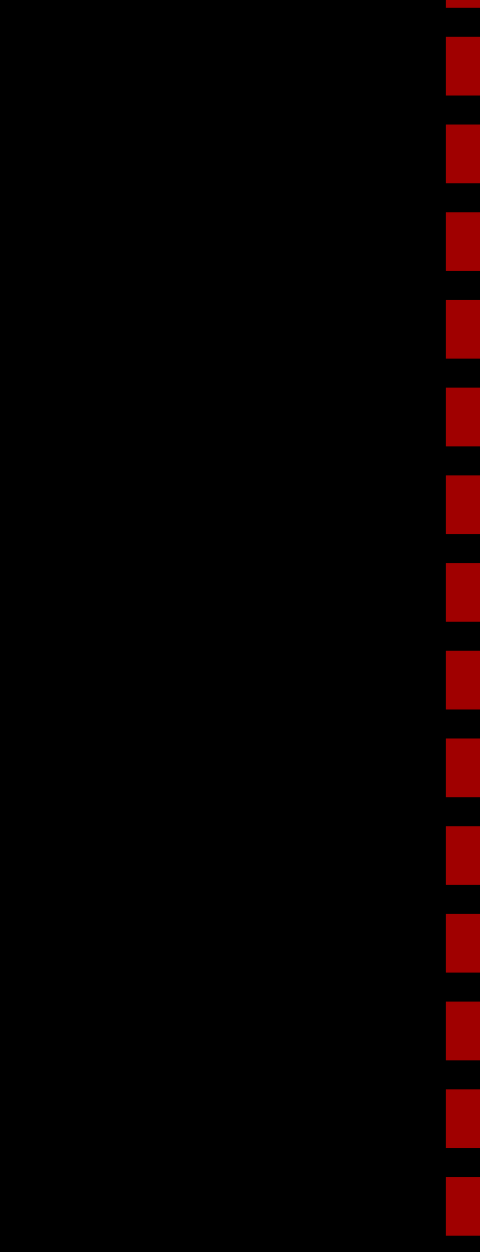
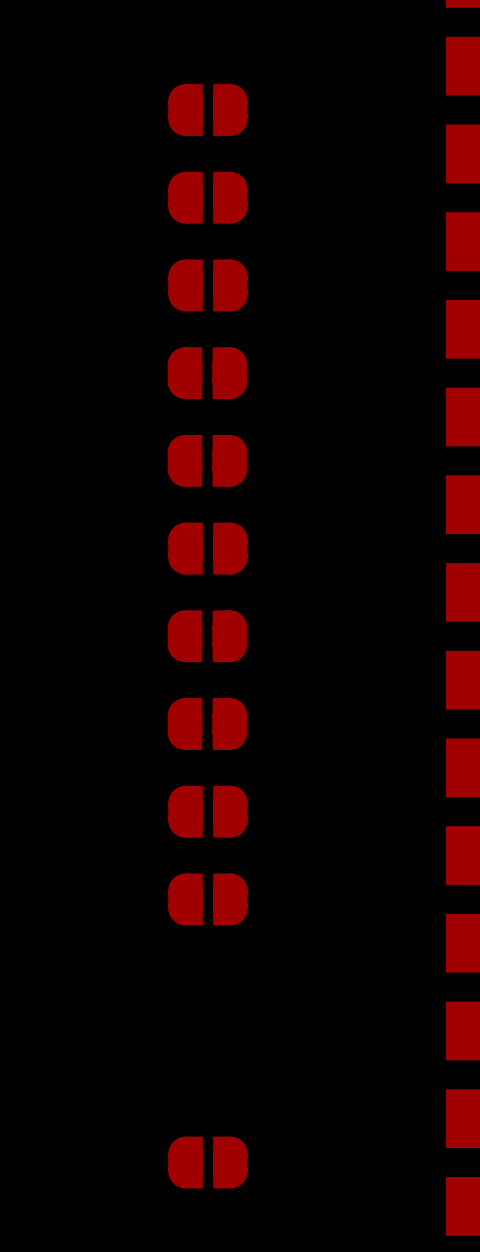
part: none -> (207, 110)
part: none -> (207, 197)
part: none -> (207, 285)
part: none -> (207, 373)
part: none -> (207, 460)
part: none -> (207, 548)
part: none -> (207, 636)
part: none -> (207, 723)
part: none -> (207, 811)
part: none -> (207, 899)
part: none -> (207, 1162)

